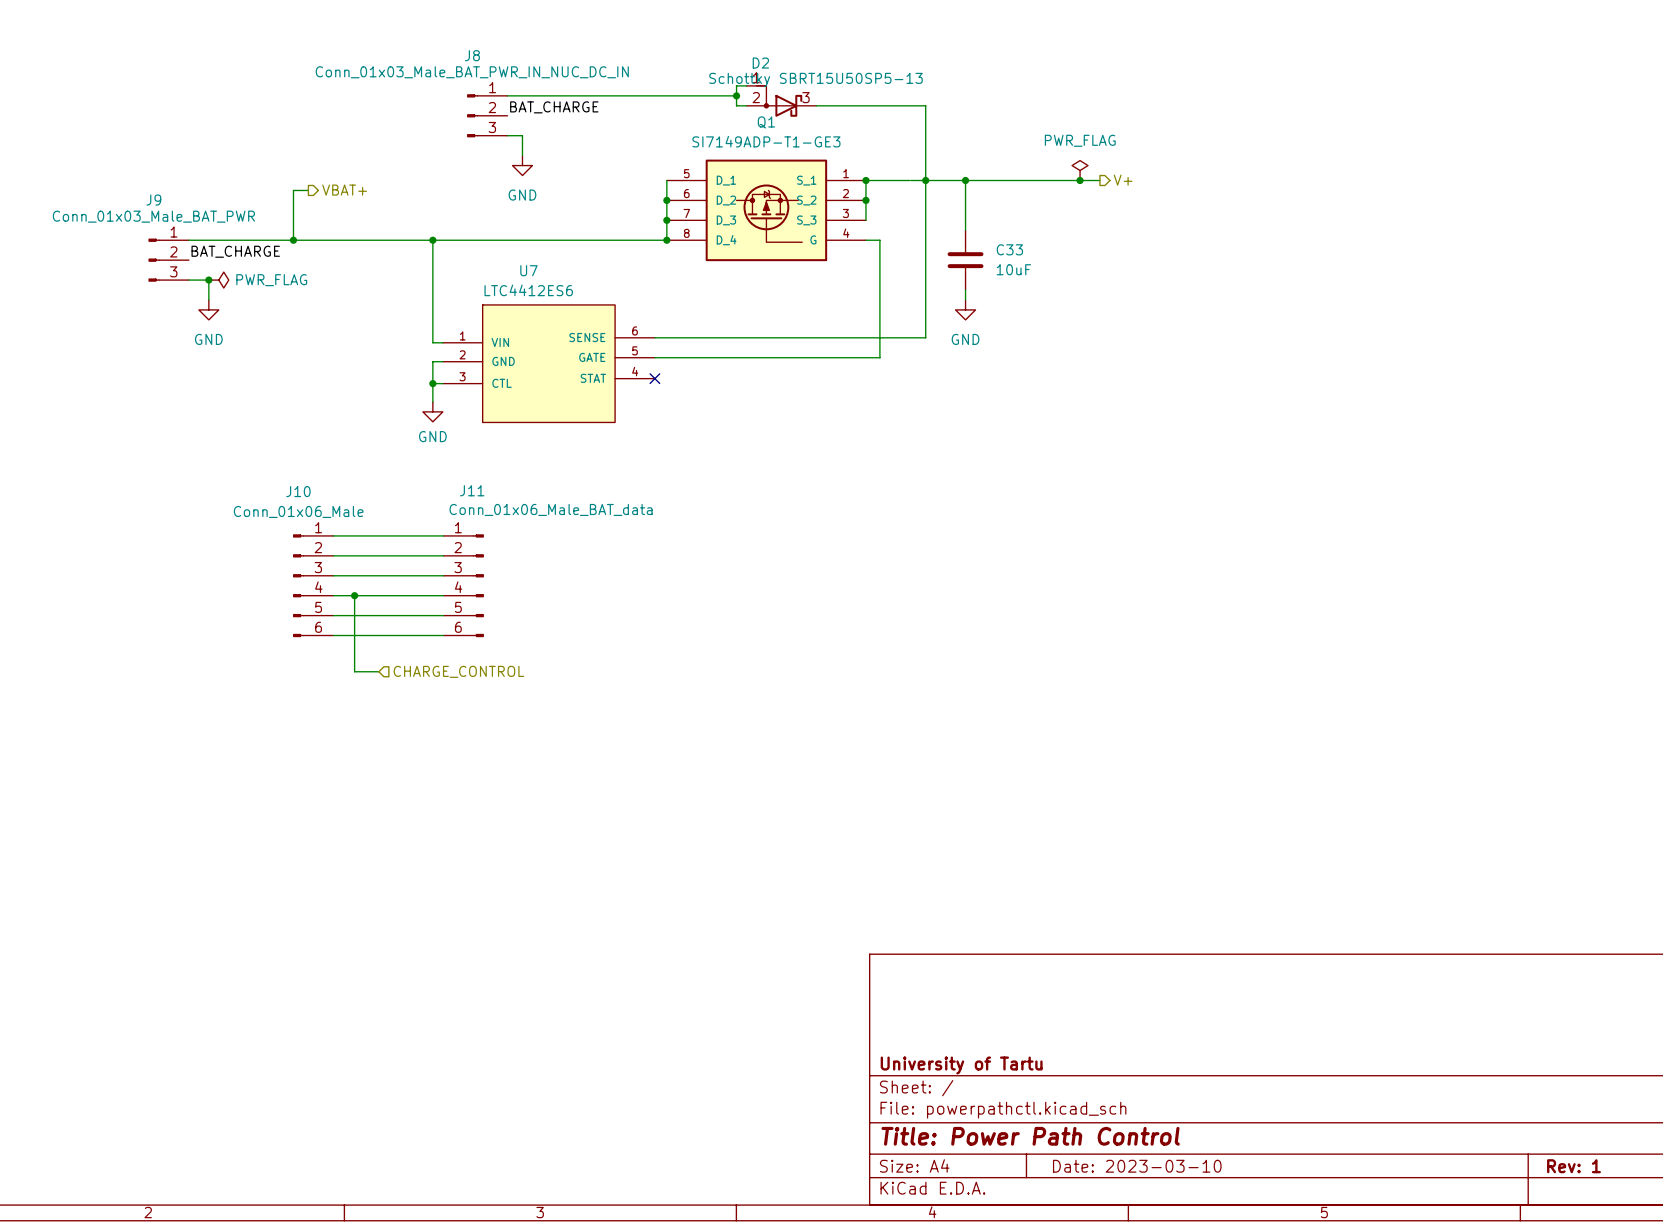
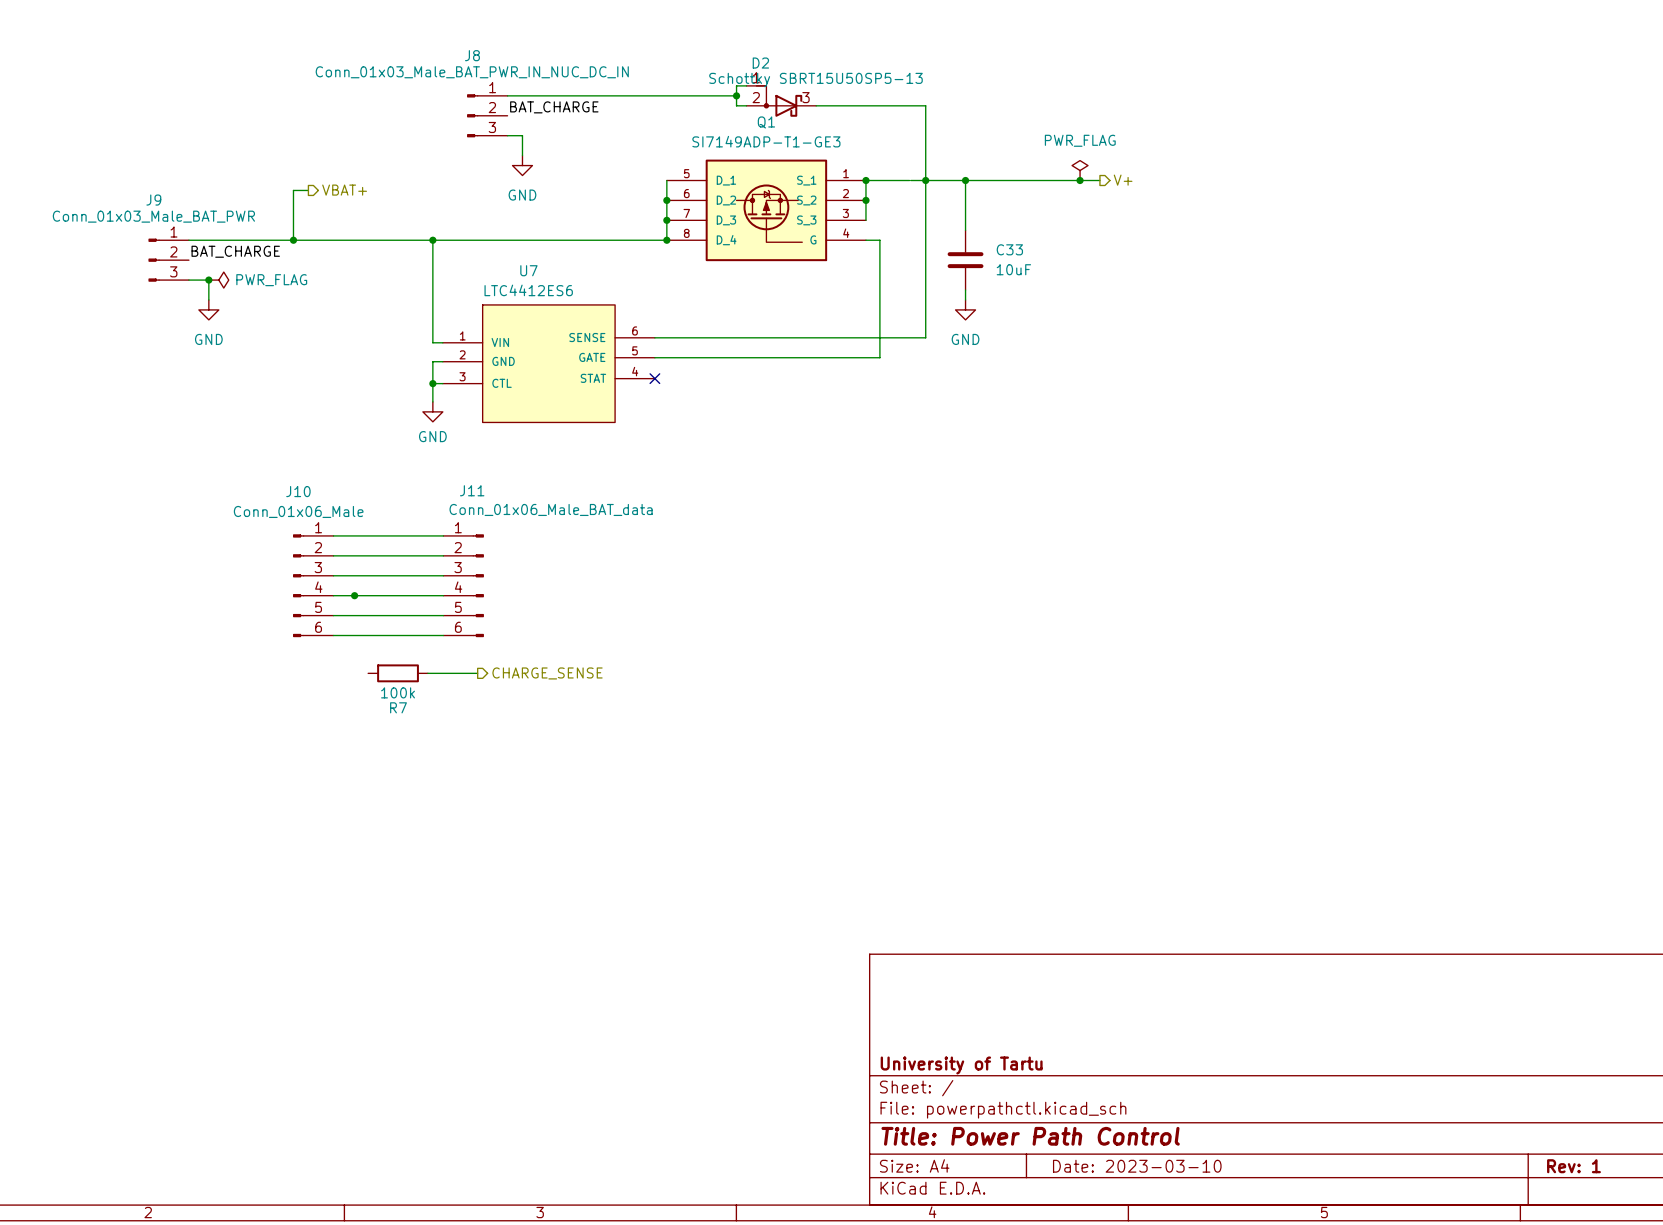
wire: (354, 595) (354, 671) (378, 671) -> none
hierarchical label shape: input (458, 671) -> output (547, 673)
hierarchical label: CHARGE_CONTROL (458, 671) -> CHARGE_SENSE (547, 673)
R7: none -> 100k (398, 673)
wire: none -> (427, 673) (477, 673)

